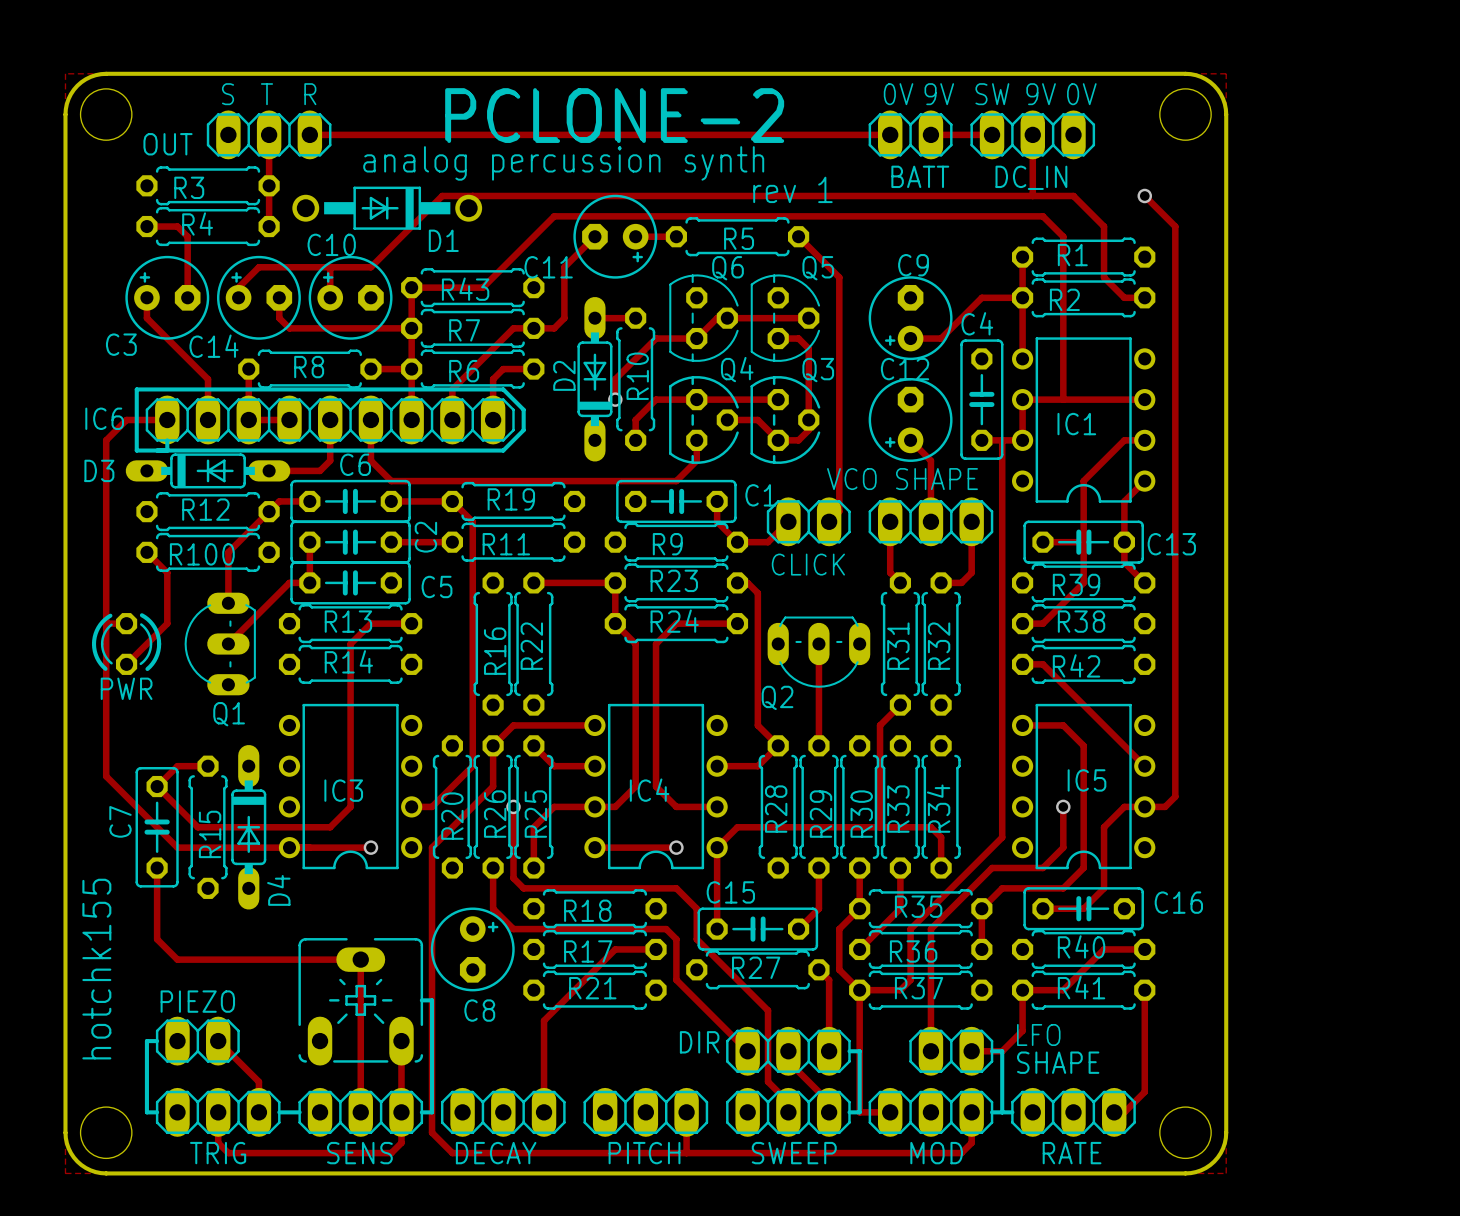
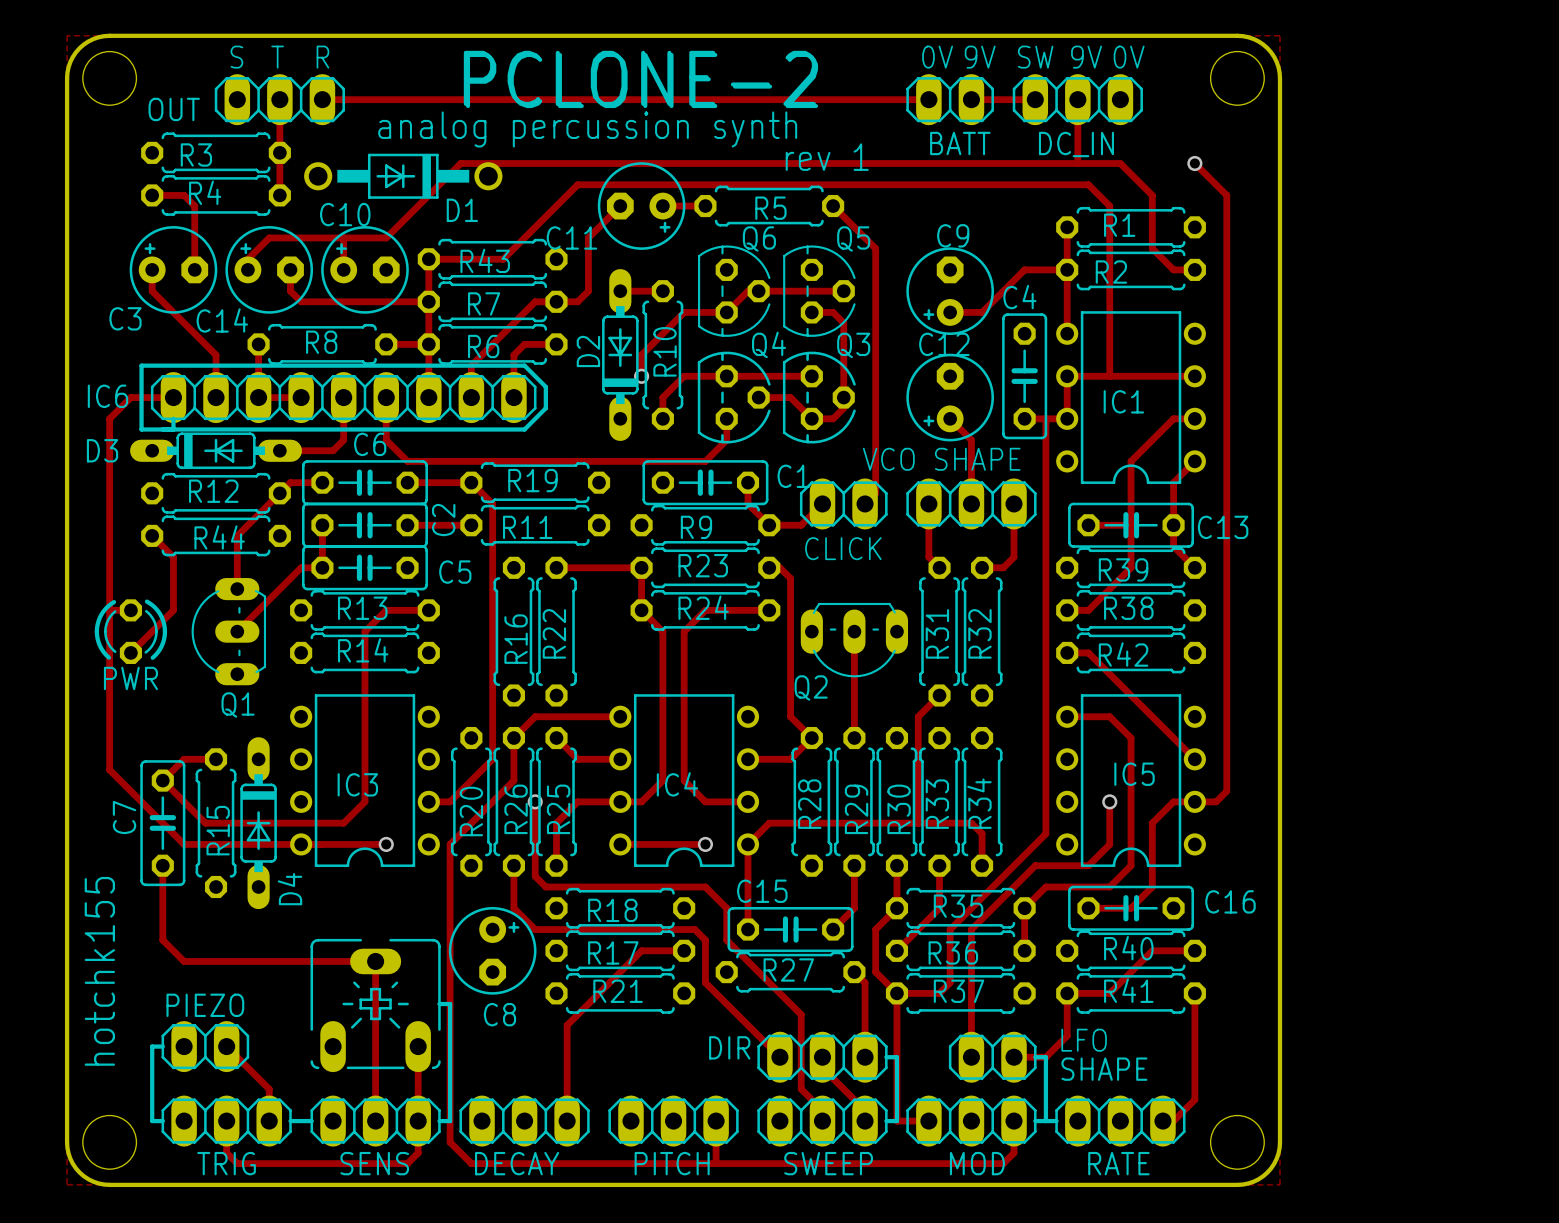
R100 name: R100 (202, 554) -> R44 (219, 537)

